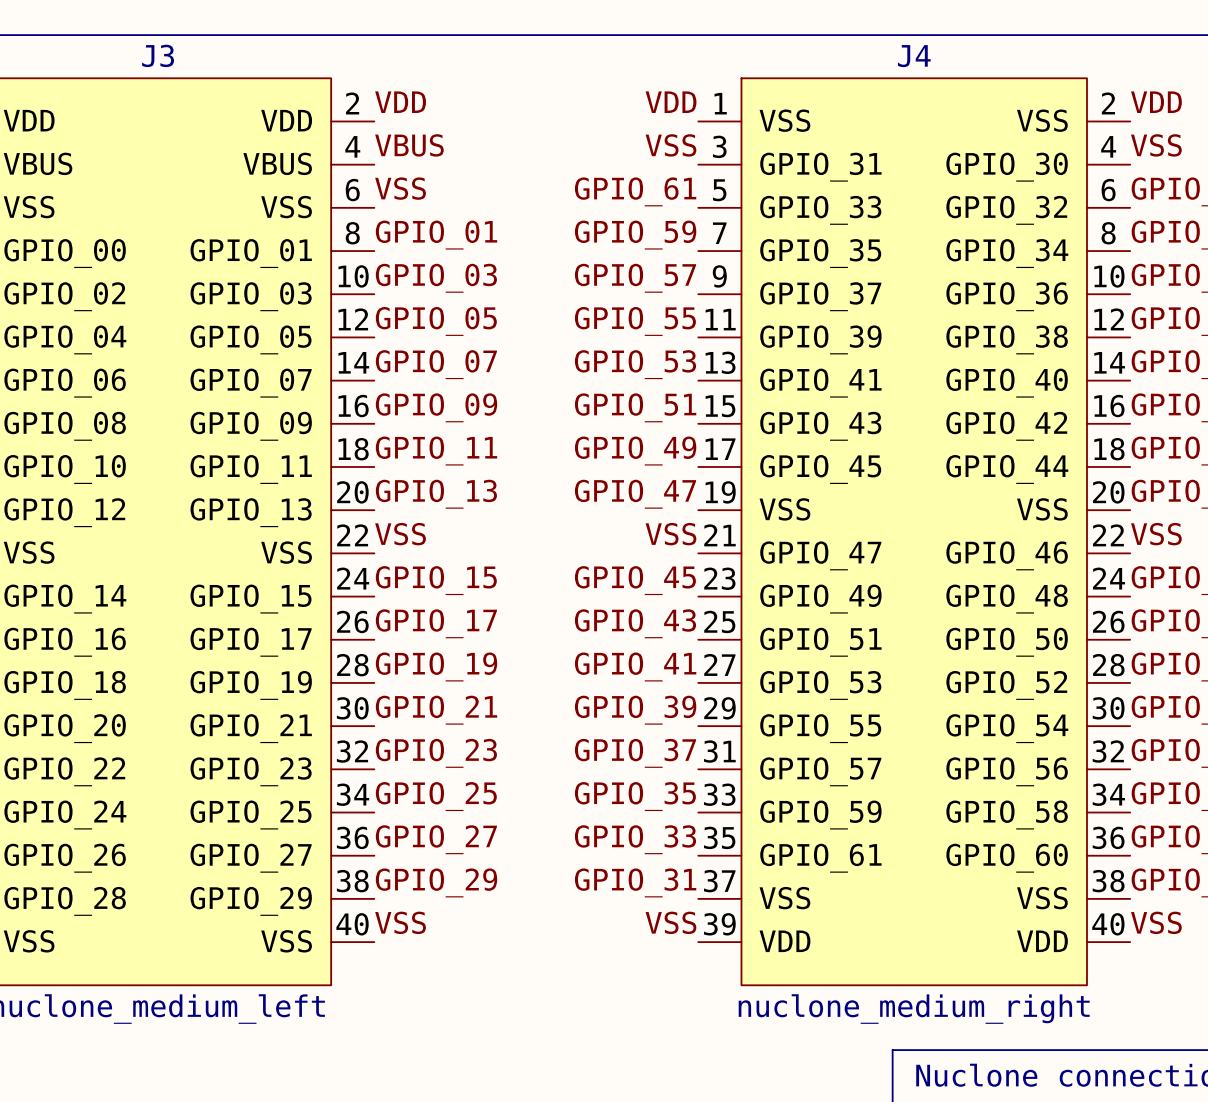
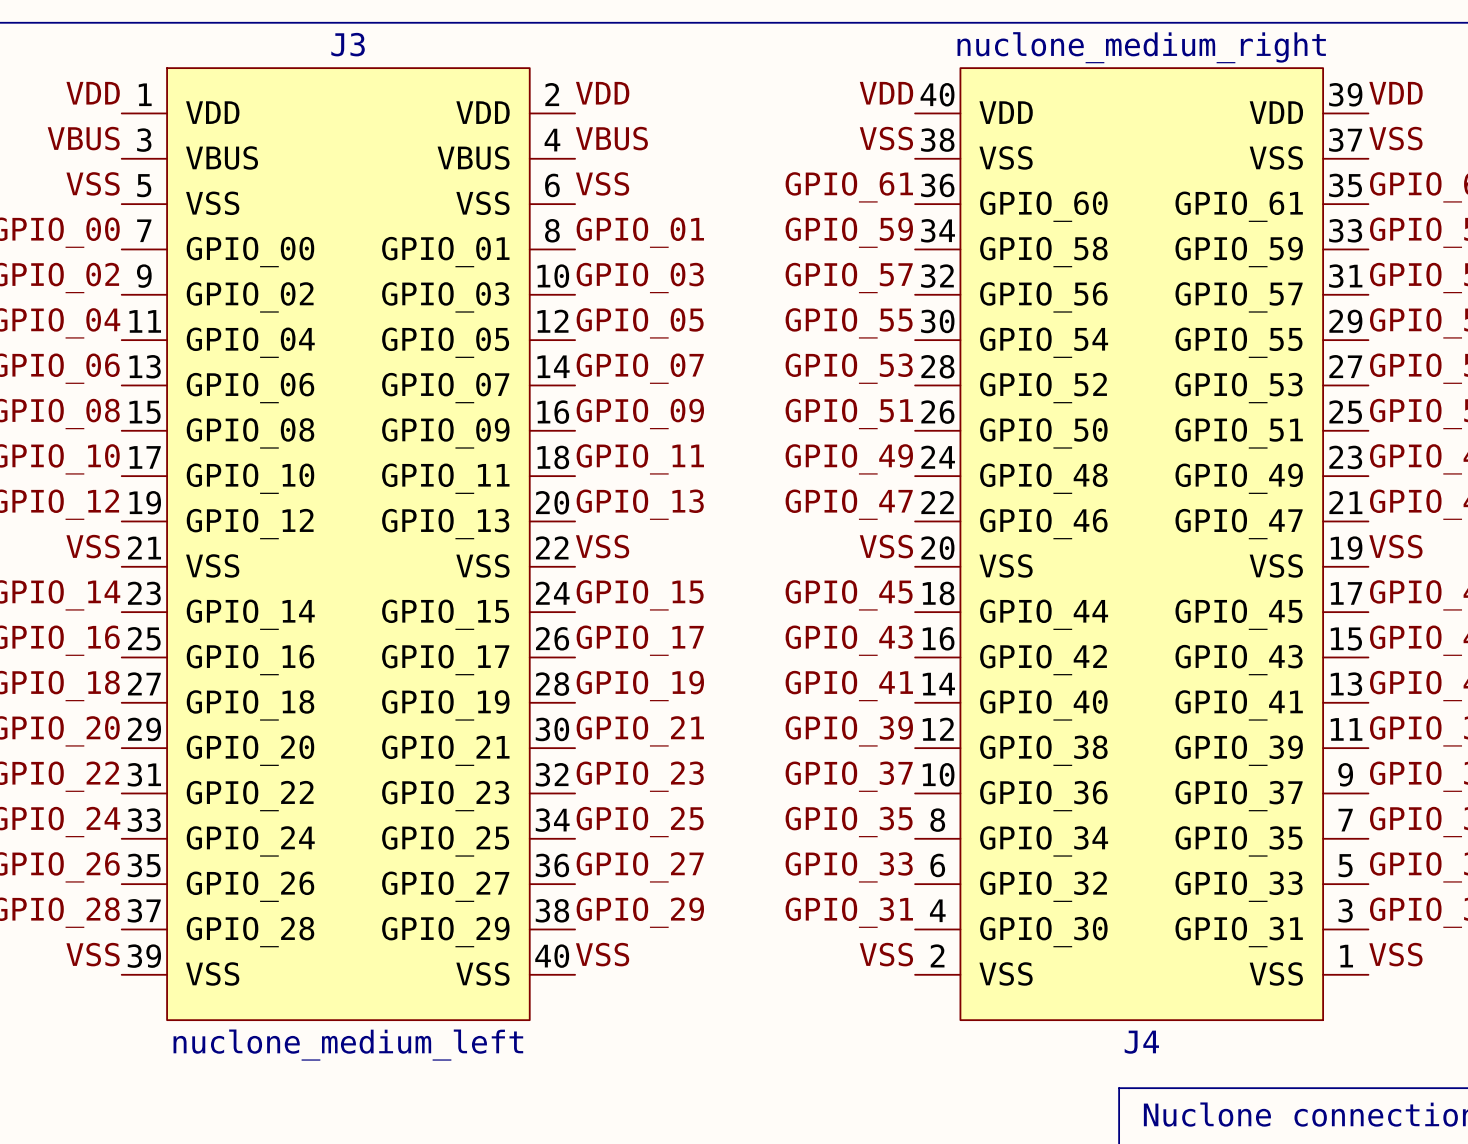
J4 rotation: 0° (914, 531) -> 180° (1141, 544)

